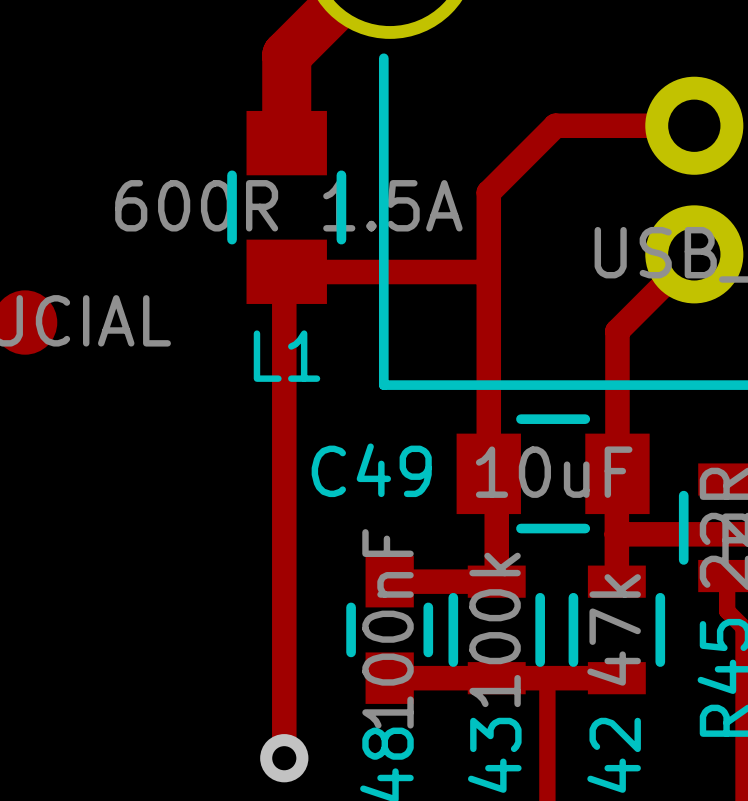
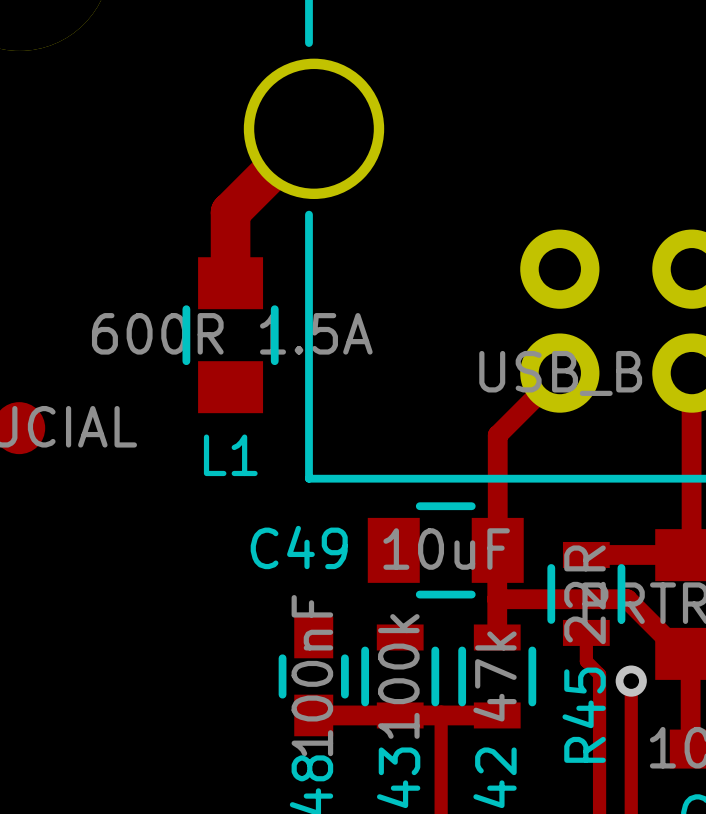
track: (694, 125) (555, 125) (488, 192) (488, 473) (496, 481) (496, 581) (389, 581) -> none
track: (488, 272) (286, 272) (284, 274) (284, 758) -> none
via: (284, 758) -> none

